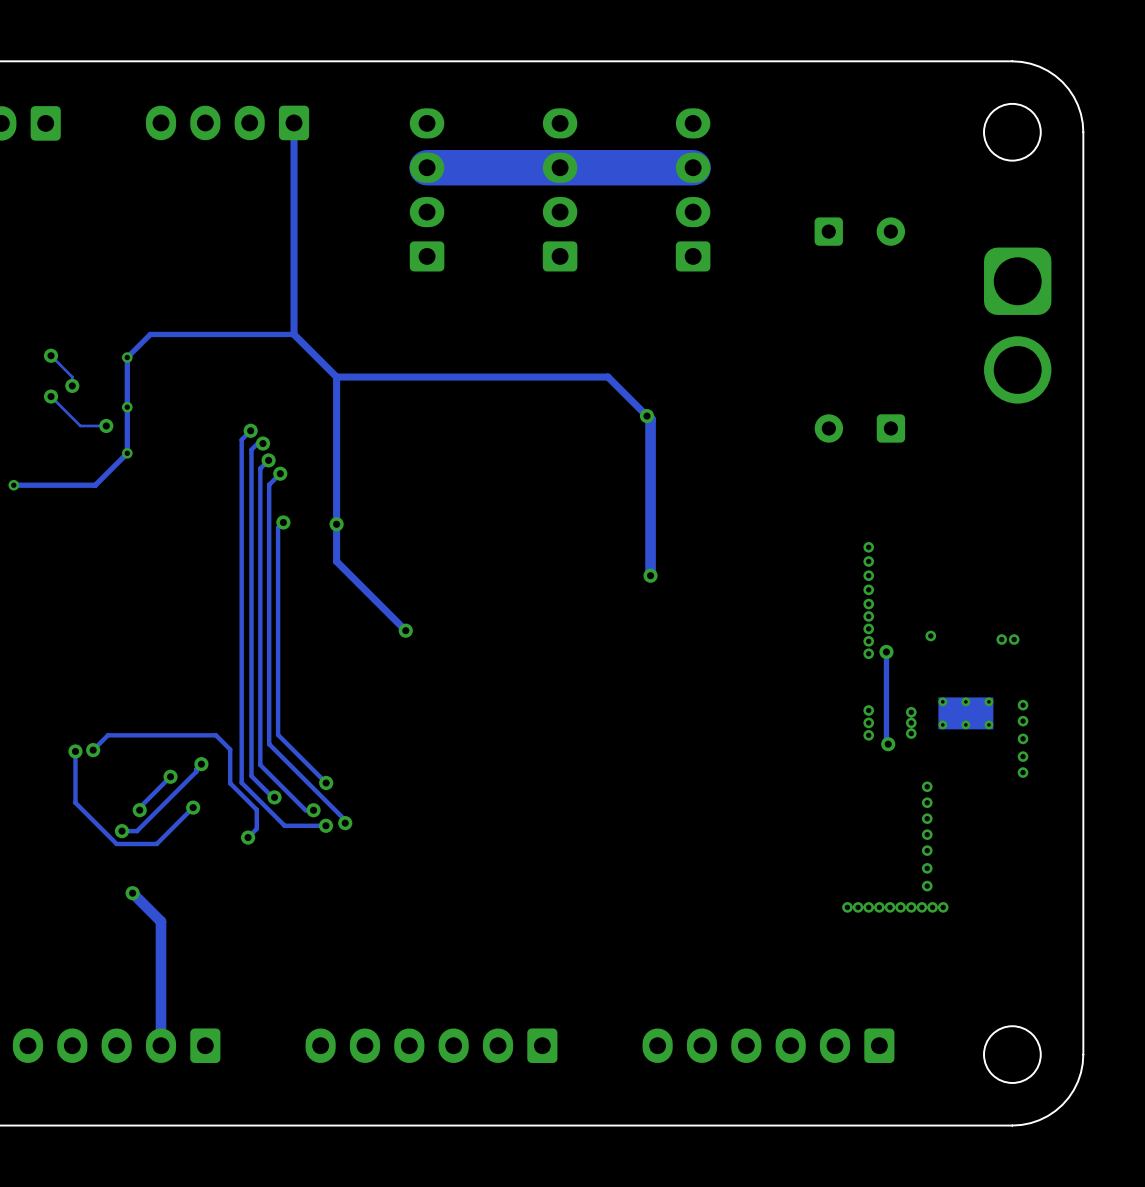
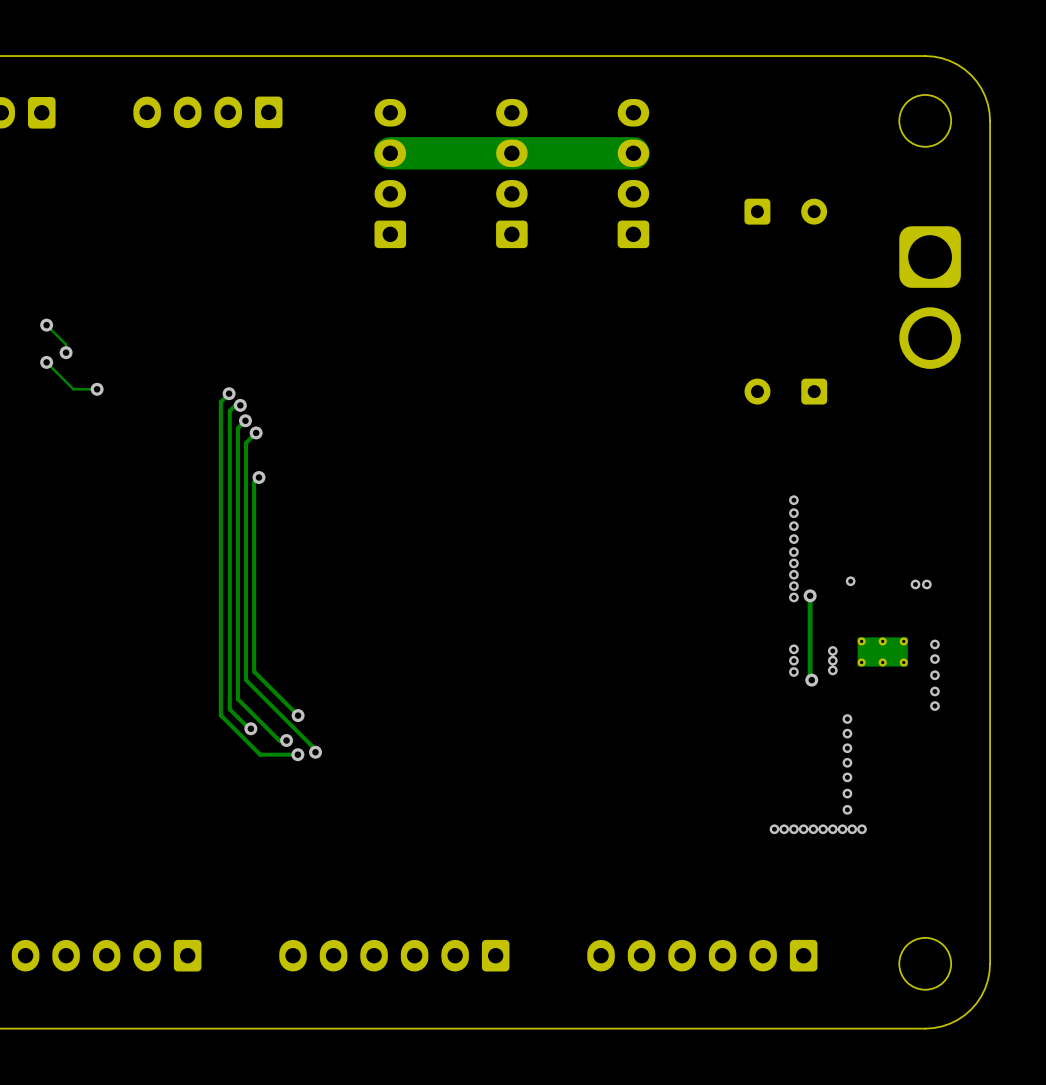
track: (294, 122) (294, 334) -> none
track: (294, 334) (150, 334) (127, 357) (127, 451) (129, 453) -> none
track: (294, 334) (336, 377) -> none
via: (127, 357) -> none
track: (336, 377) (336, 561) (405, 630) -> none
track: (336, 377) (607, 377) (650, 419) (650, 575) -> none
via: (127, 407) -> none
via: (647, 416) -> none
track: (127, 453) (95, 485) (13, 485) -> none
via: (127, 453) -> none
via: (13, 485) -> none
via: (336, 524) -> none
via: (650, 575) -> none
via: (405, 630) -> none
track: (93, 750) (107, 735) (215, 735) (230, 749) (230, 783) (256, 809) (256, 828) (248, 837) -> none
via: (93, 750) -> none
track: (75, 751) (75, 802) (116, 843) (156, 843) (193, 807) -> none
via: (75, 751) -> none
track: (201, 764) (196, 771) (137, 831) (121, 831) -> none
via: (201, 764) -> none
track: (170, 776) (139, 807) (139, 810) -> none
via: (170, 776) -> none
via: (193, 807) -> none
via: (139, 810) -> none
via: (121, 831) -> none
via: (248, 837) -> none
track: (132, 893) (161, 921) (161, 1045) -> none
via: (132, 893) -> none

